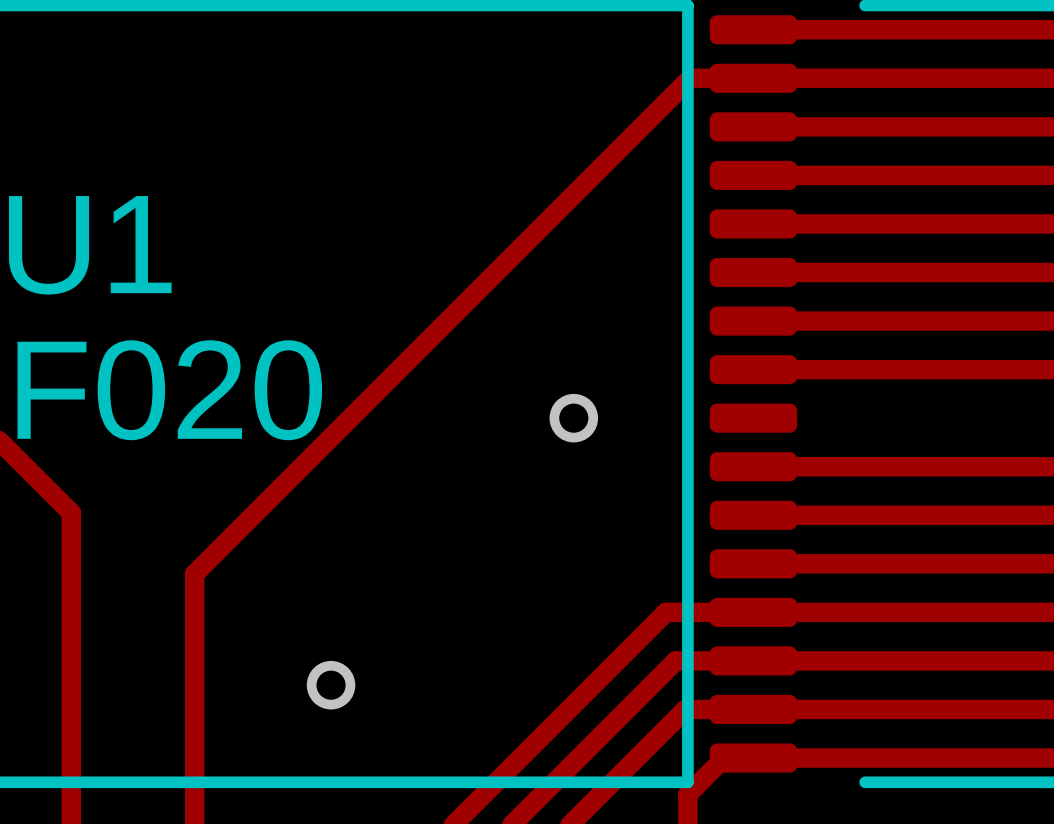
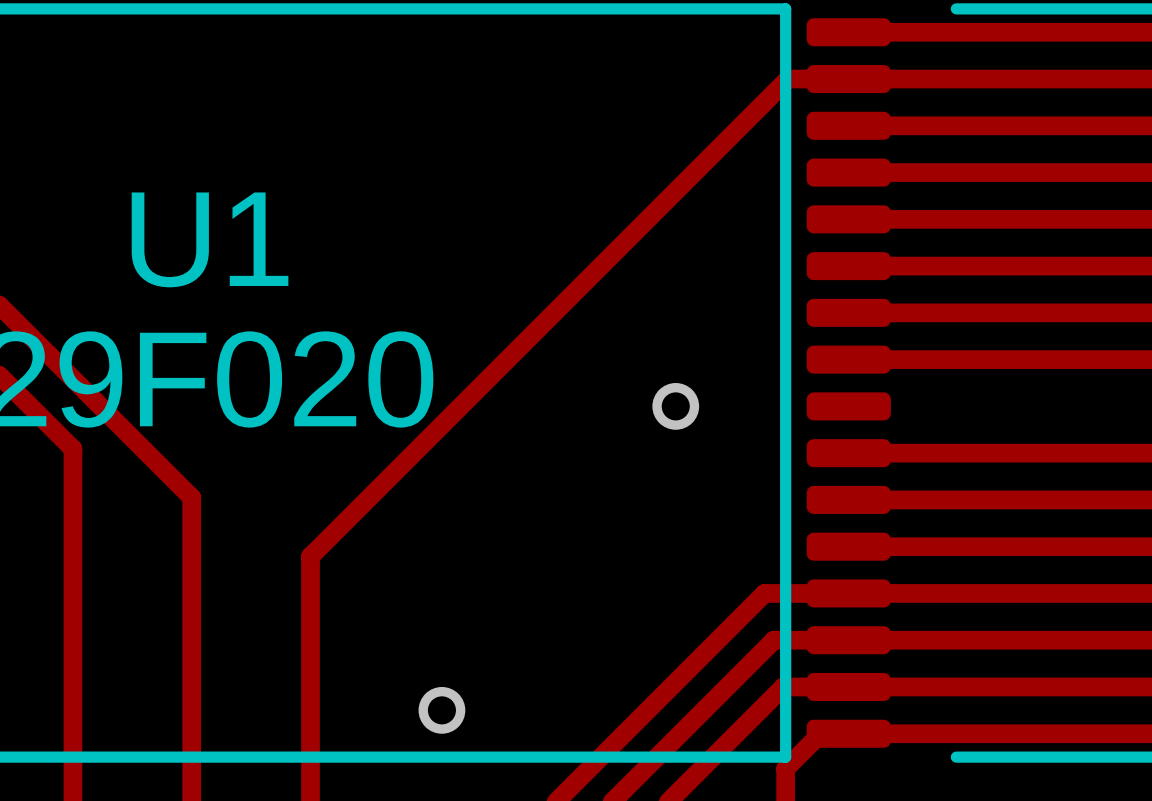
via position: (331, 685) -> (441, 710)

